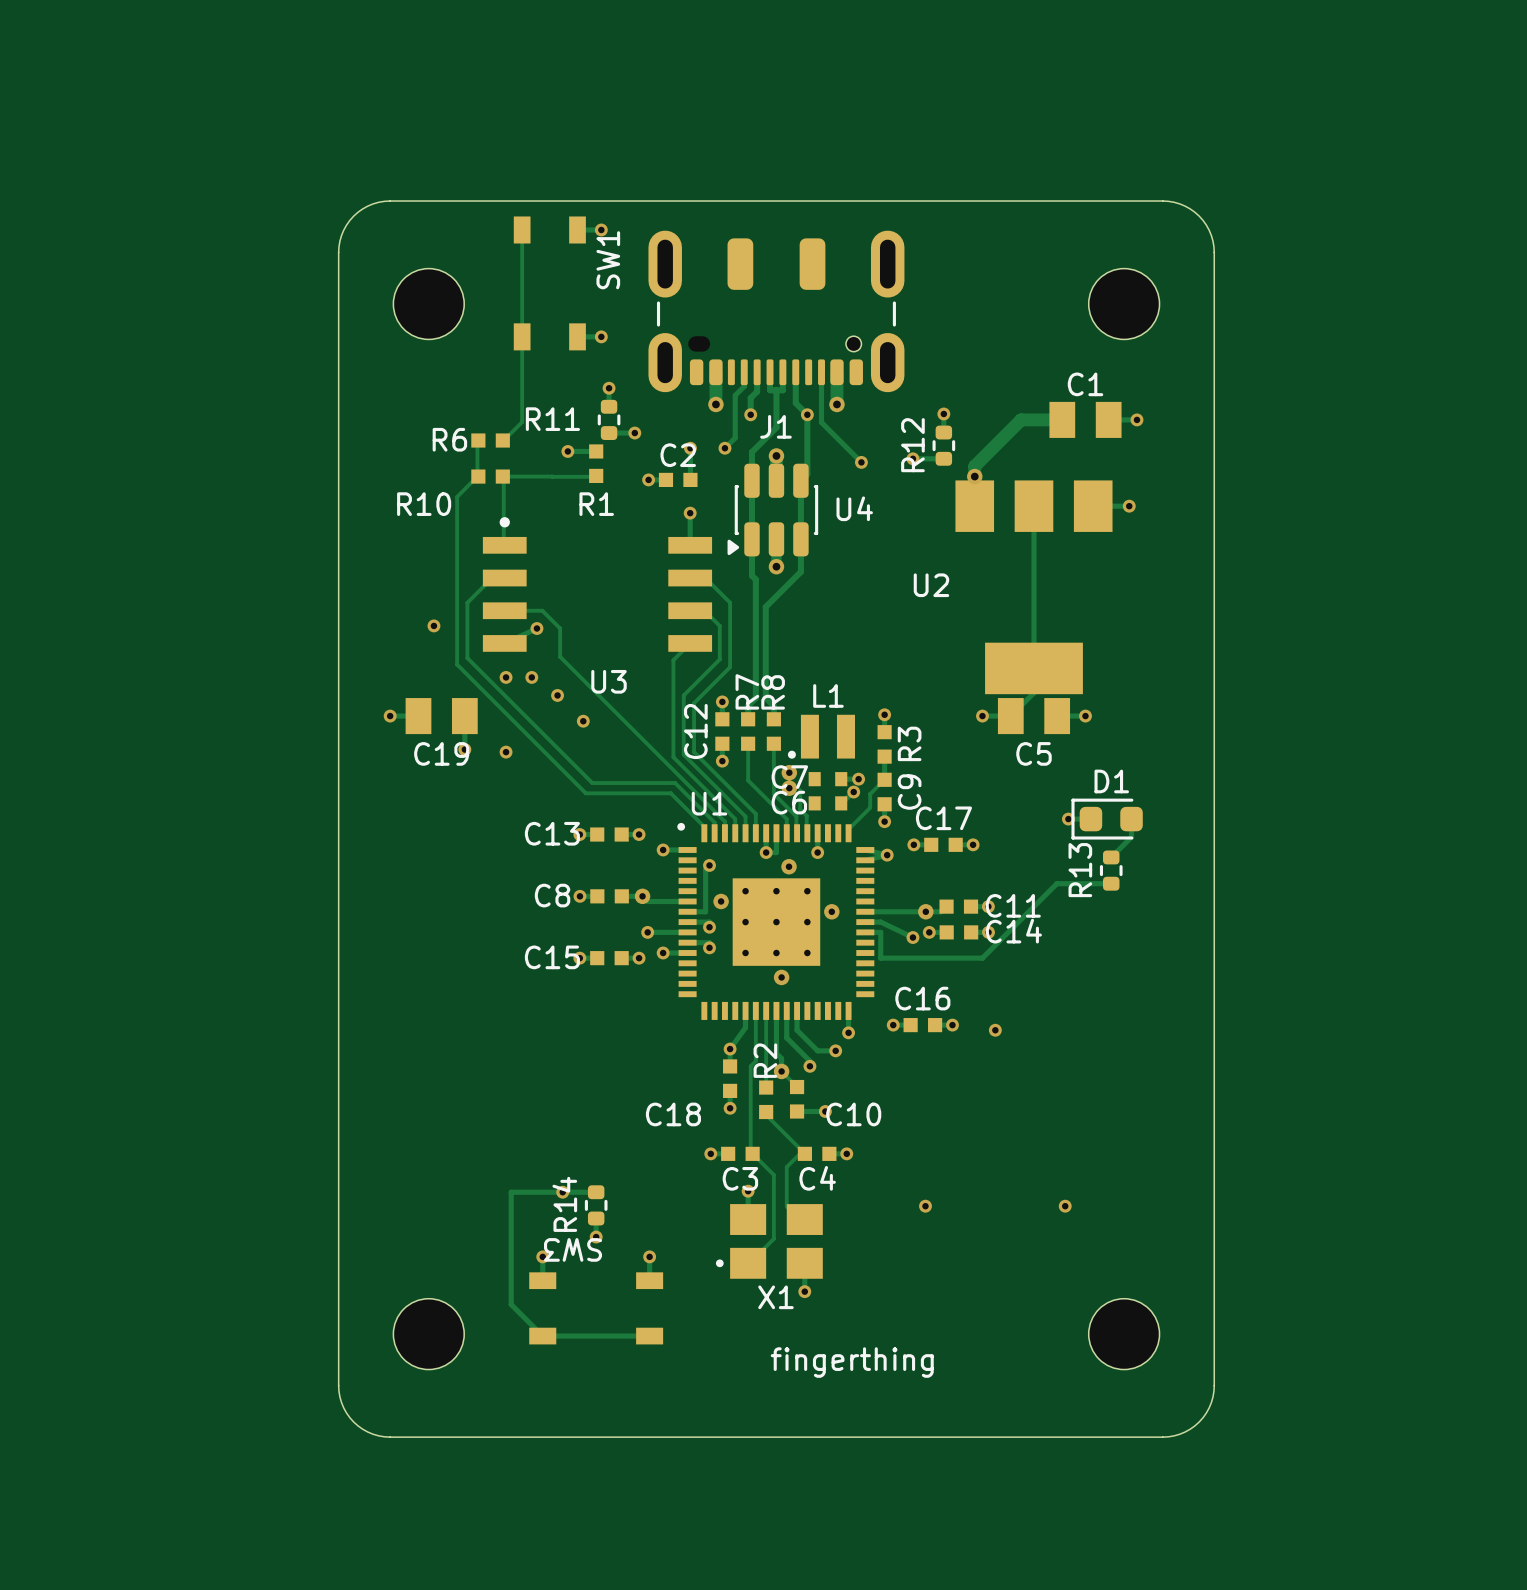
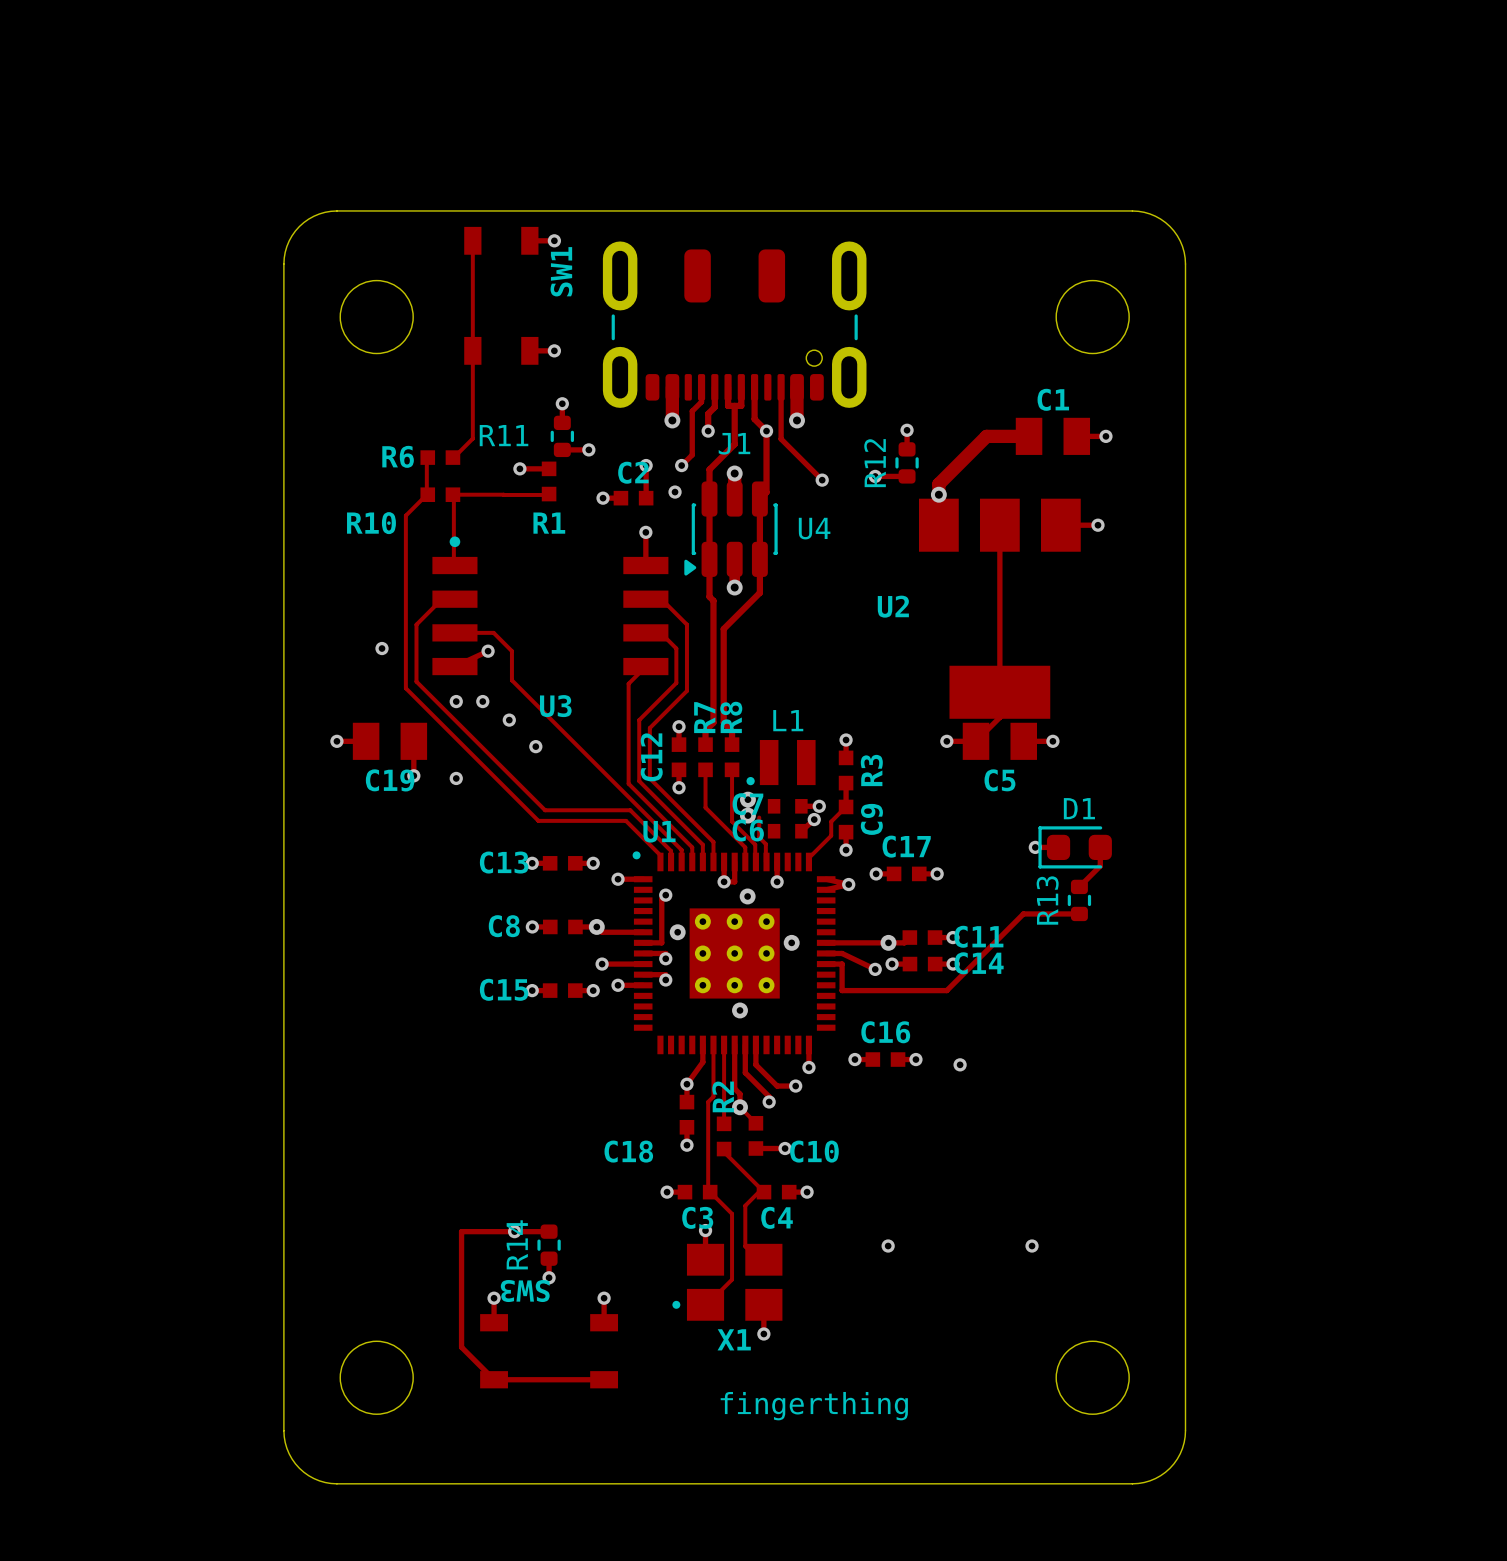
via: none -> (675, 492)

